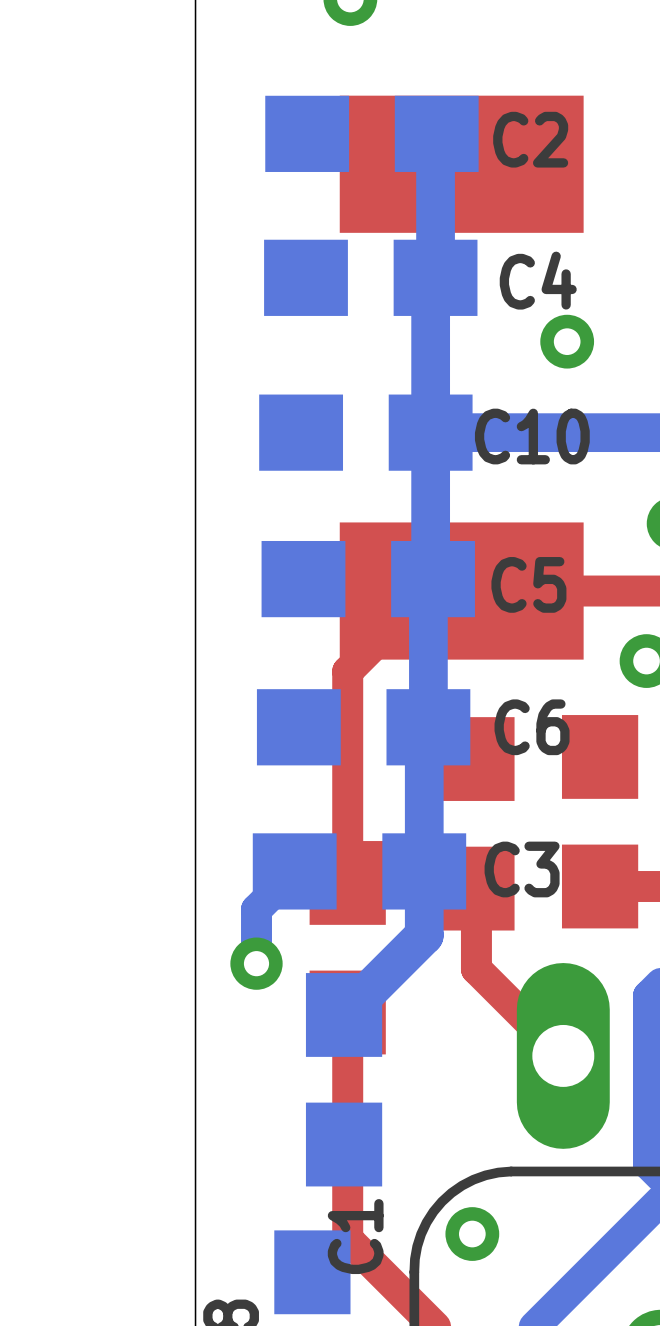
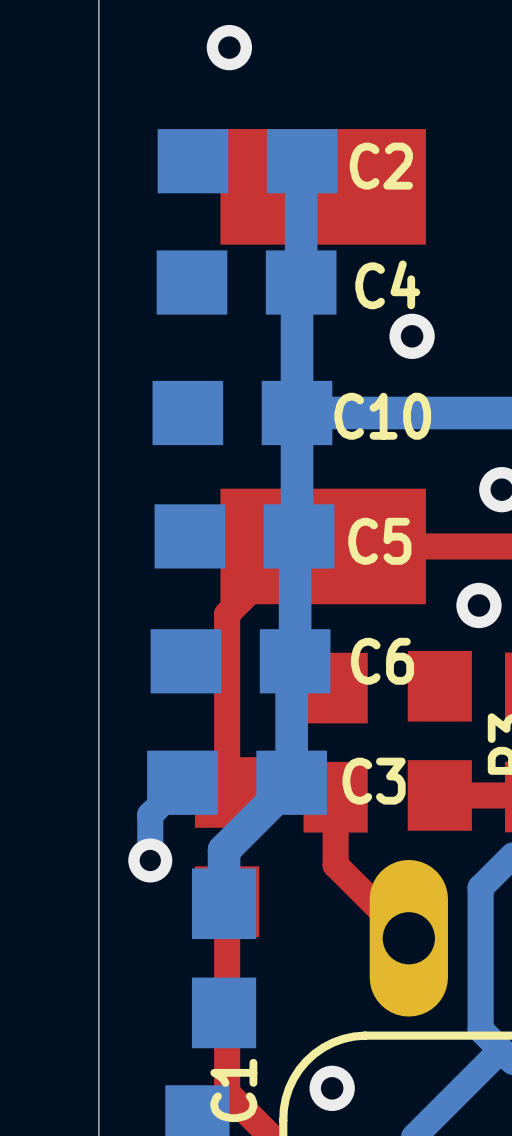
bottom track: (424, 871) (424, 935) (344, 1014) -> (291, 782) (224, 850) (224, 903)

